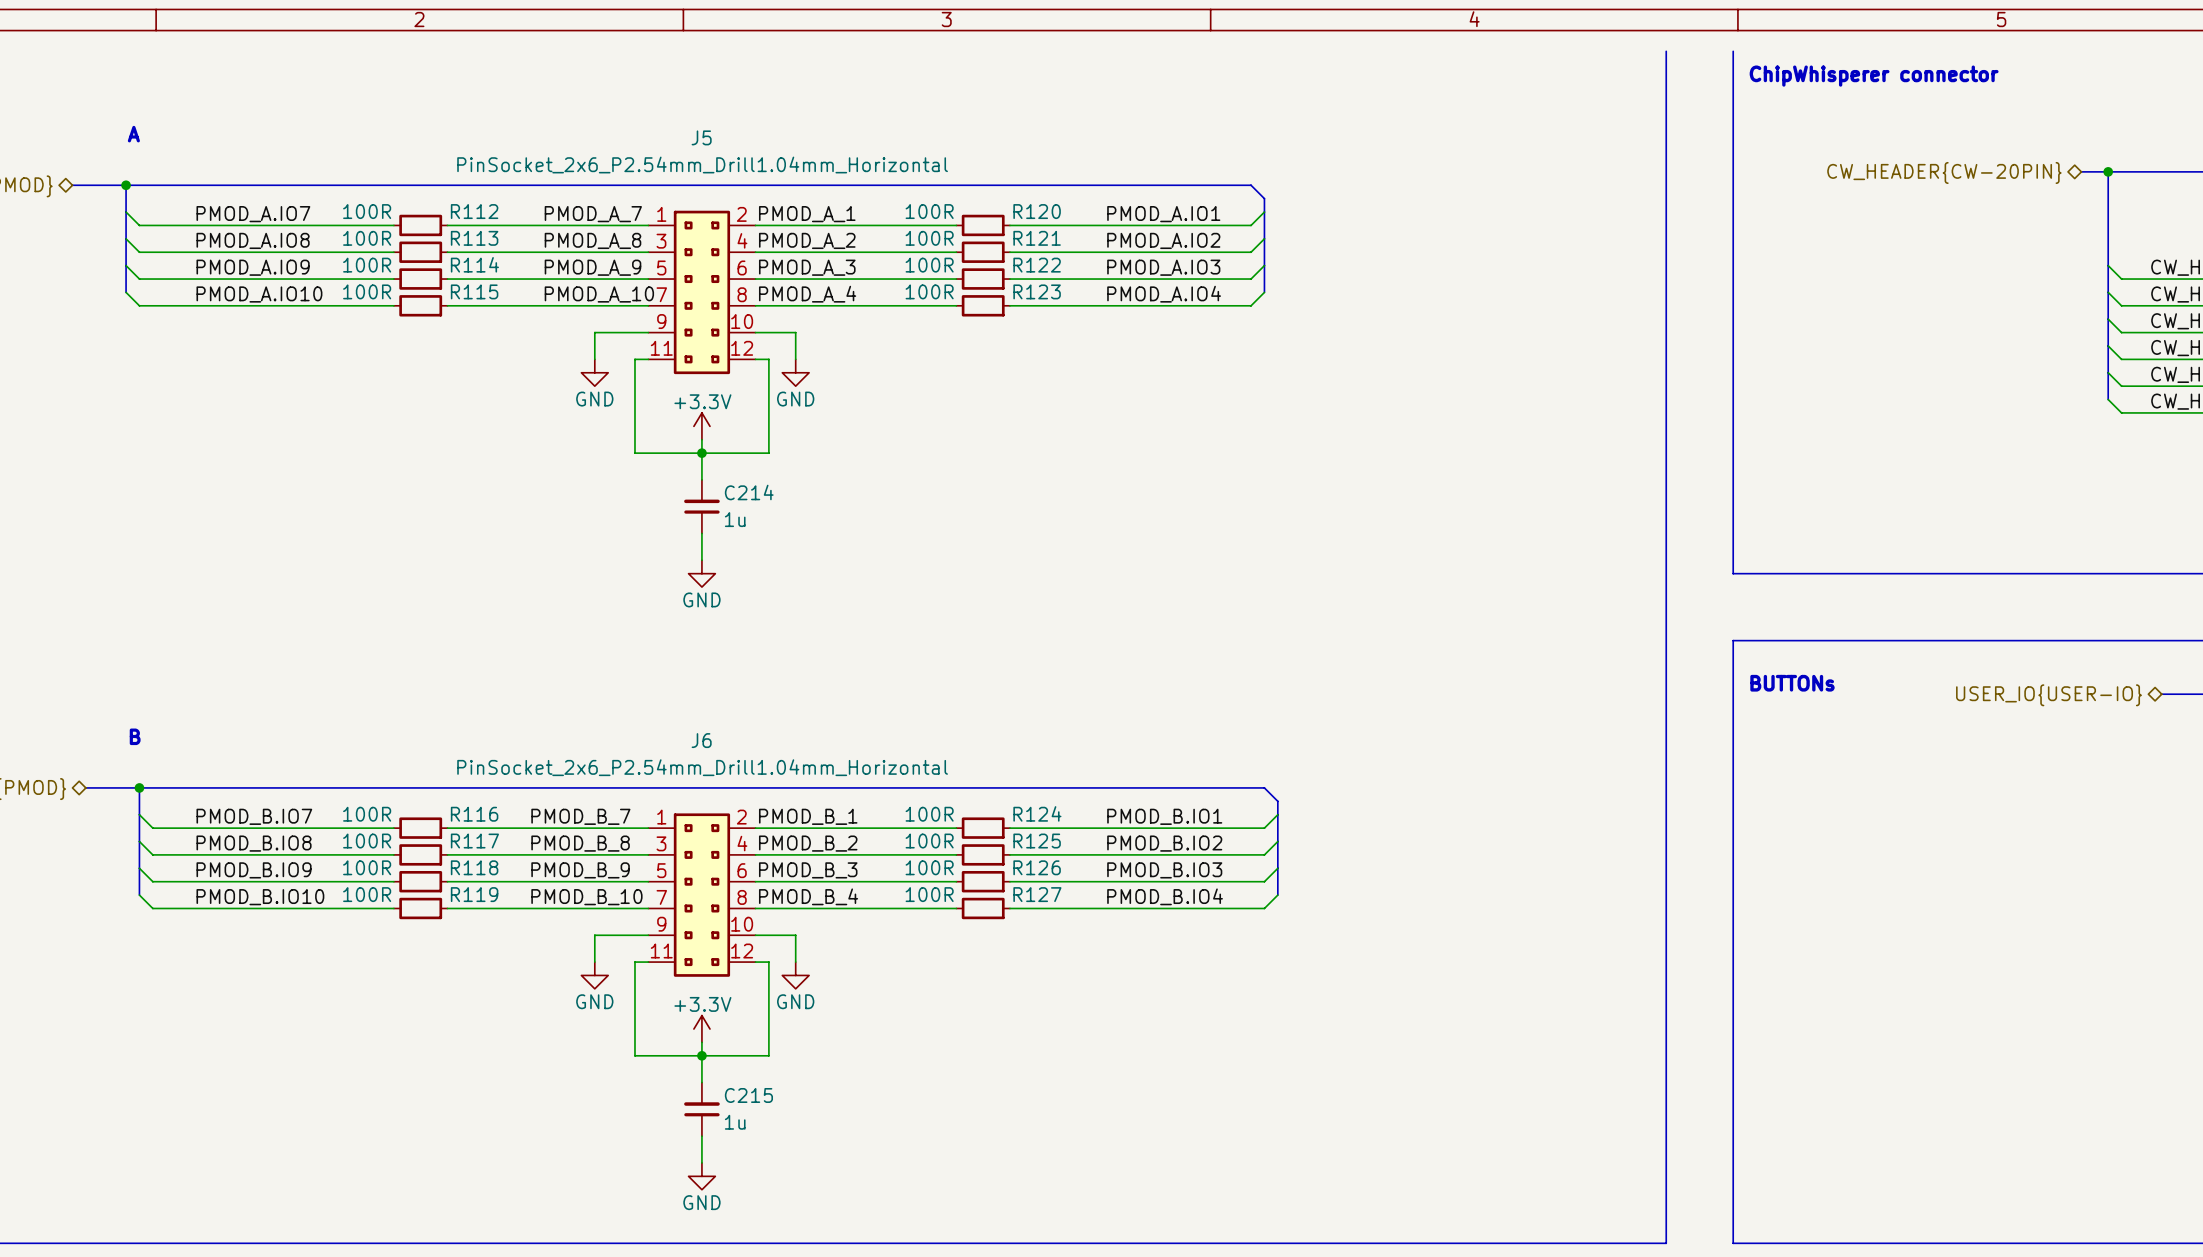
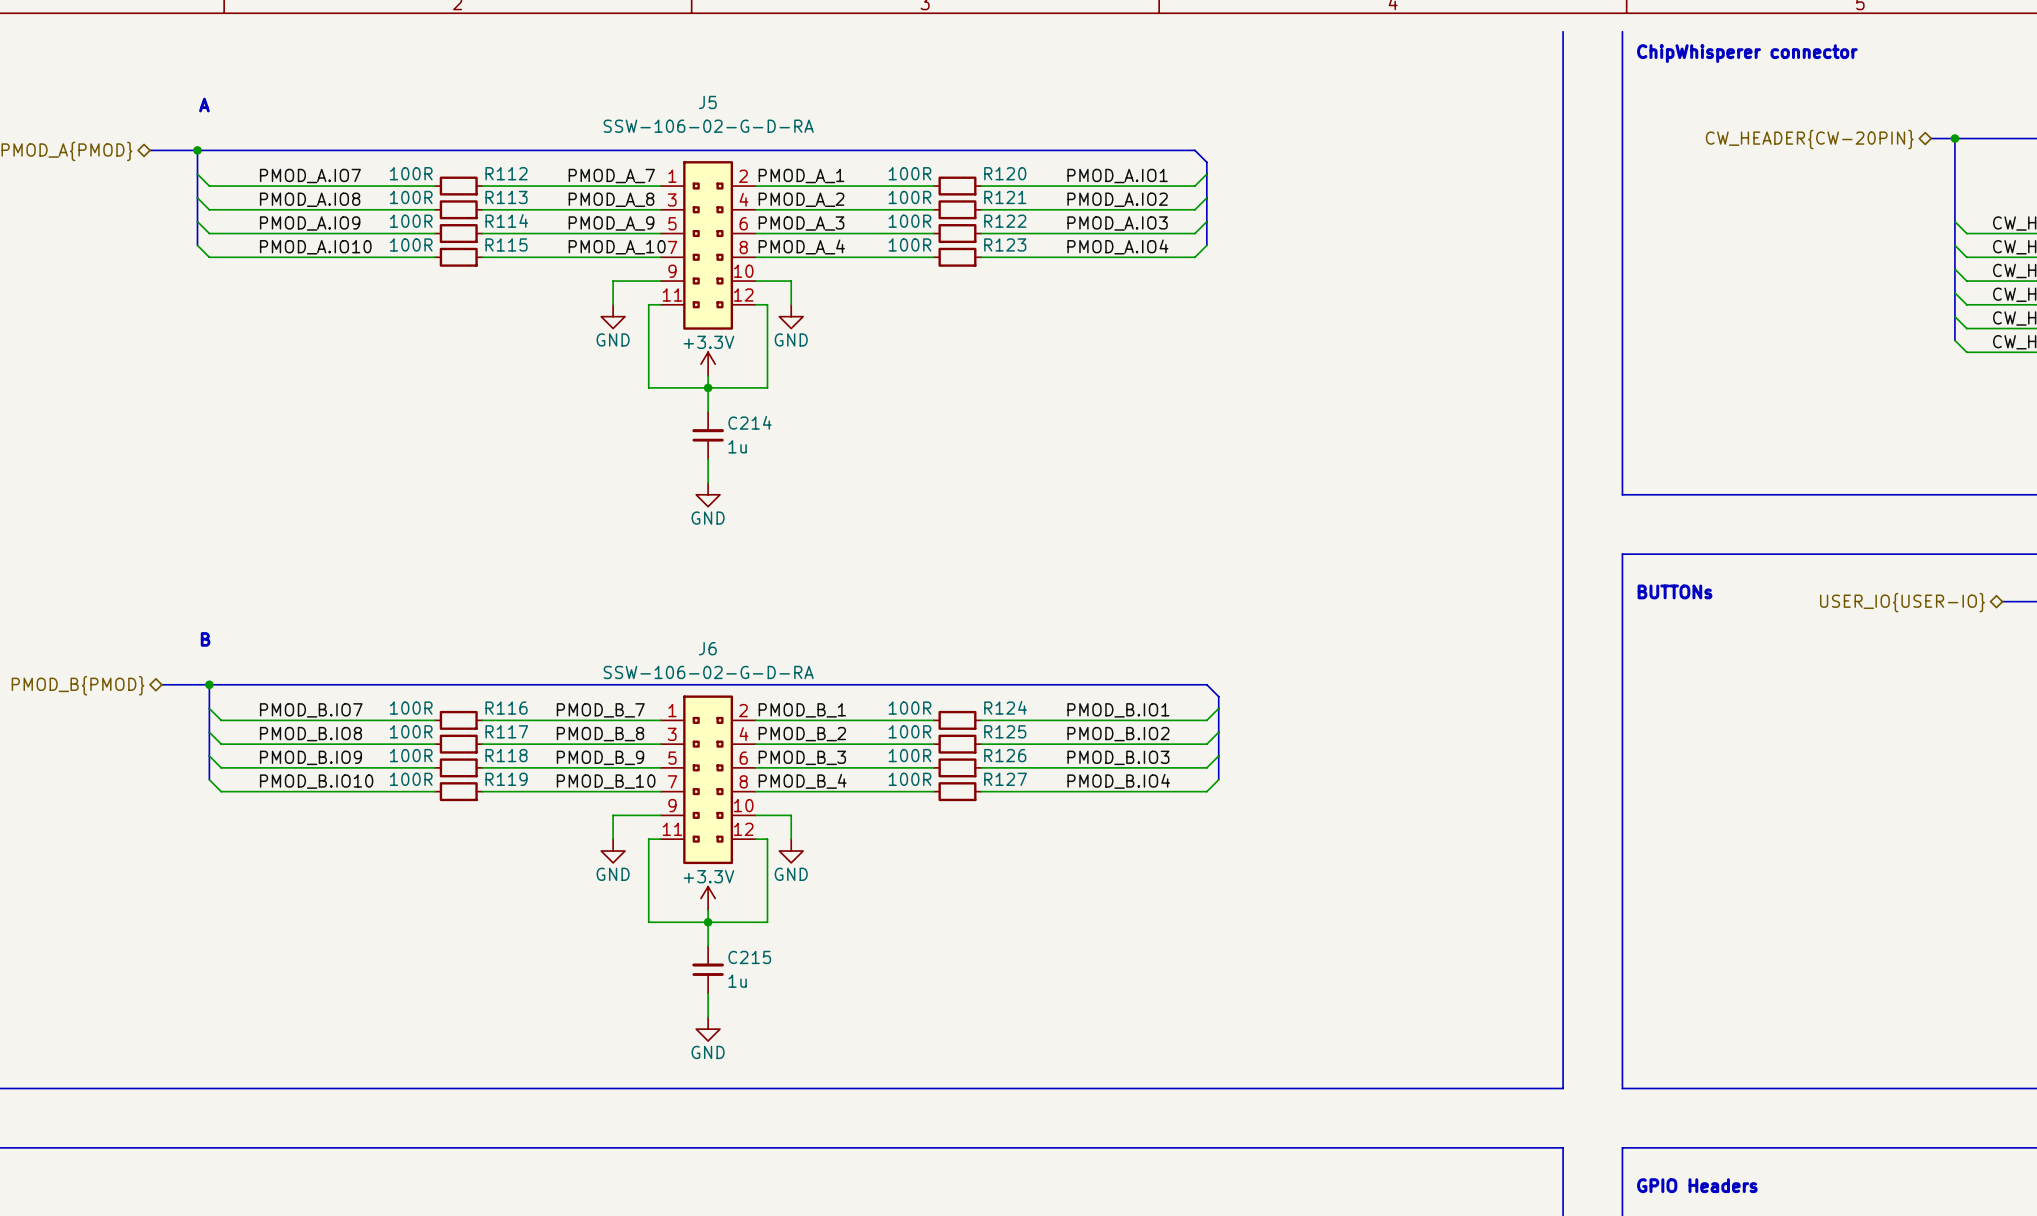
J5 text: none -> SSW-106-02-G-D-RA (708, 126)
J5 value: PinSocket_2x6_P2.54mm_Drill1.04mm_Horizontal (702, 165) -> none
J5 symbol: [648, 210, 756, 375] -> [660, 161, 756, 330]
J6 value: PinSocket_2x6_P2.54mm_Drill1.04mm_Horizontal (702, 767) -> none
J6 text: none -> SSW-106-02-G-D-RA (708, 672)
J6 symbol: [648, 813, 756, 977] -> [660, 695, 756, 865]

